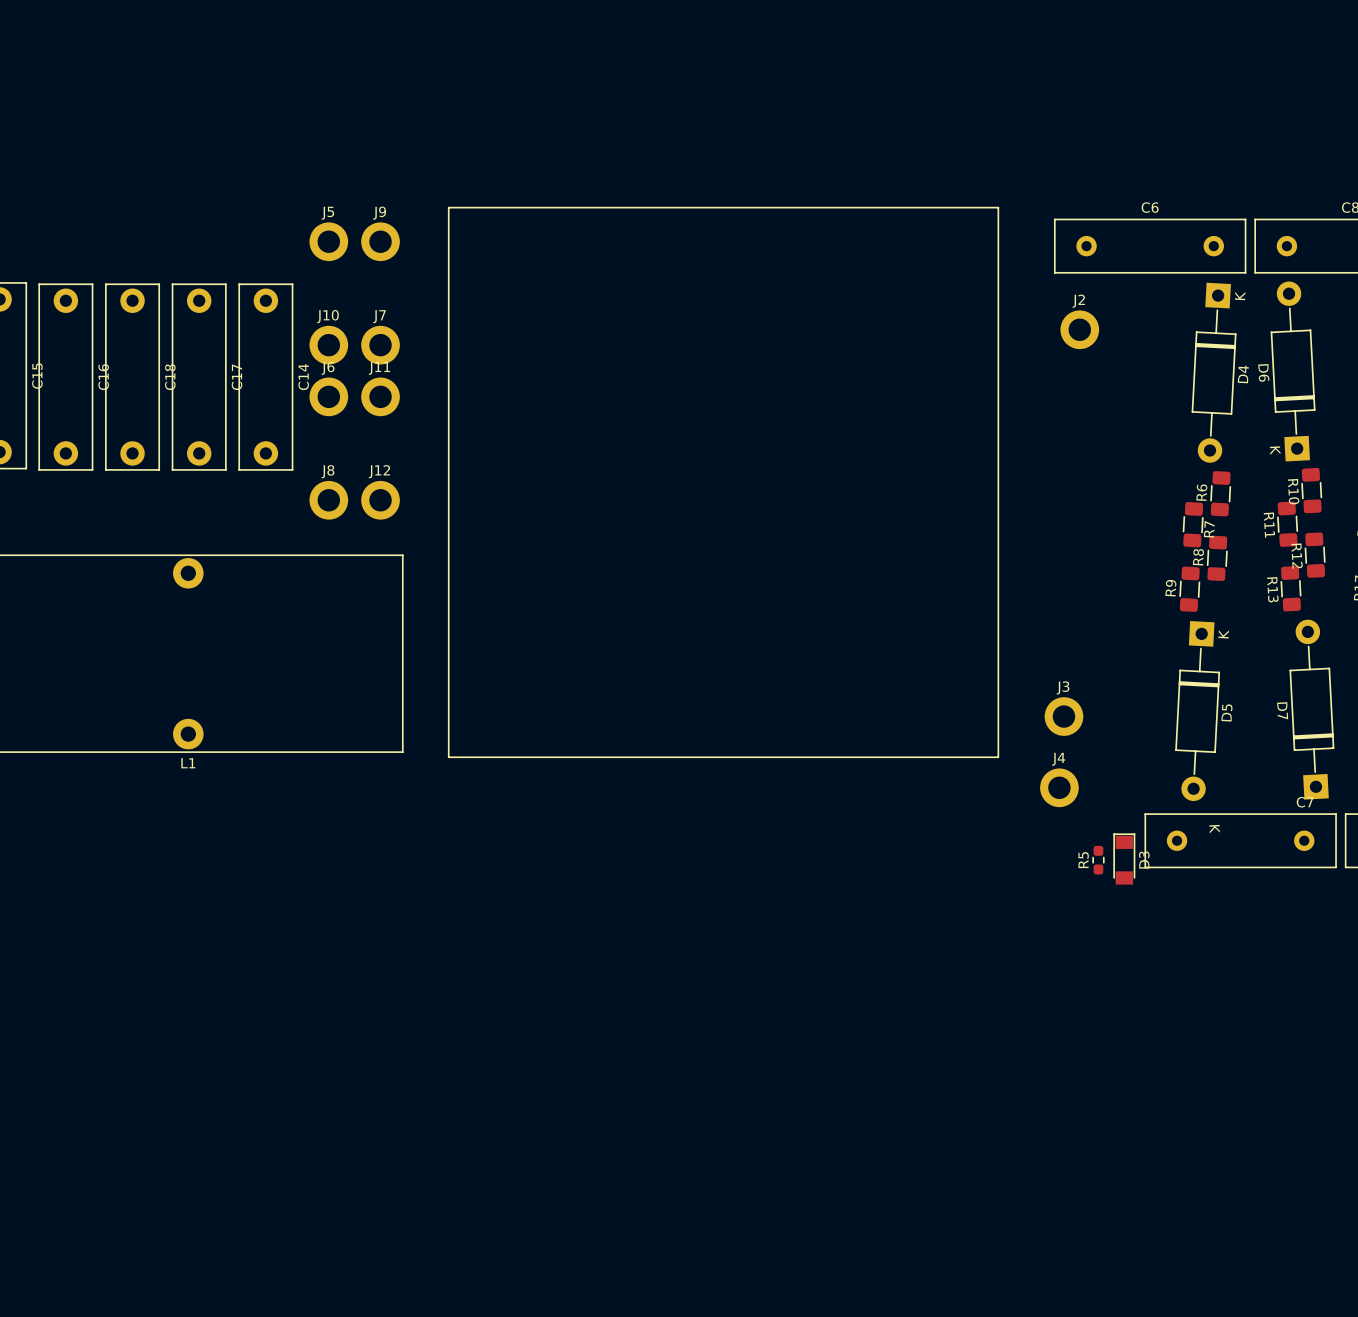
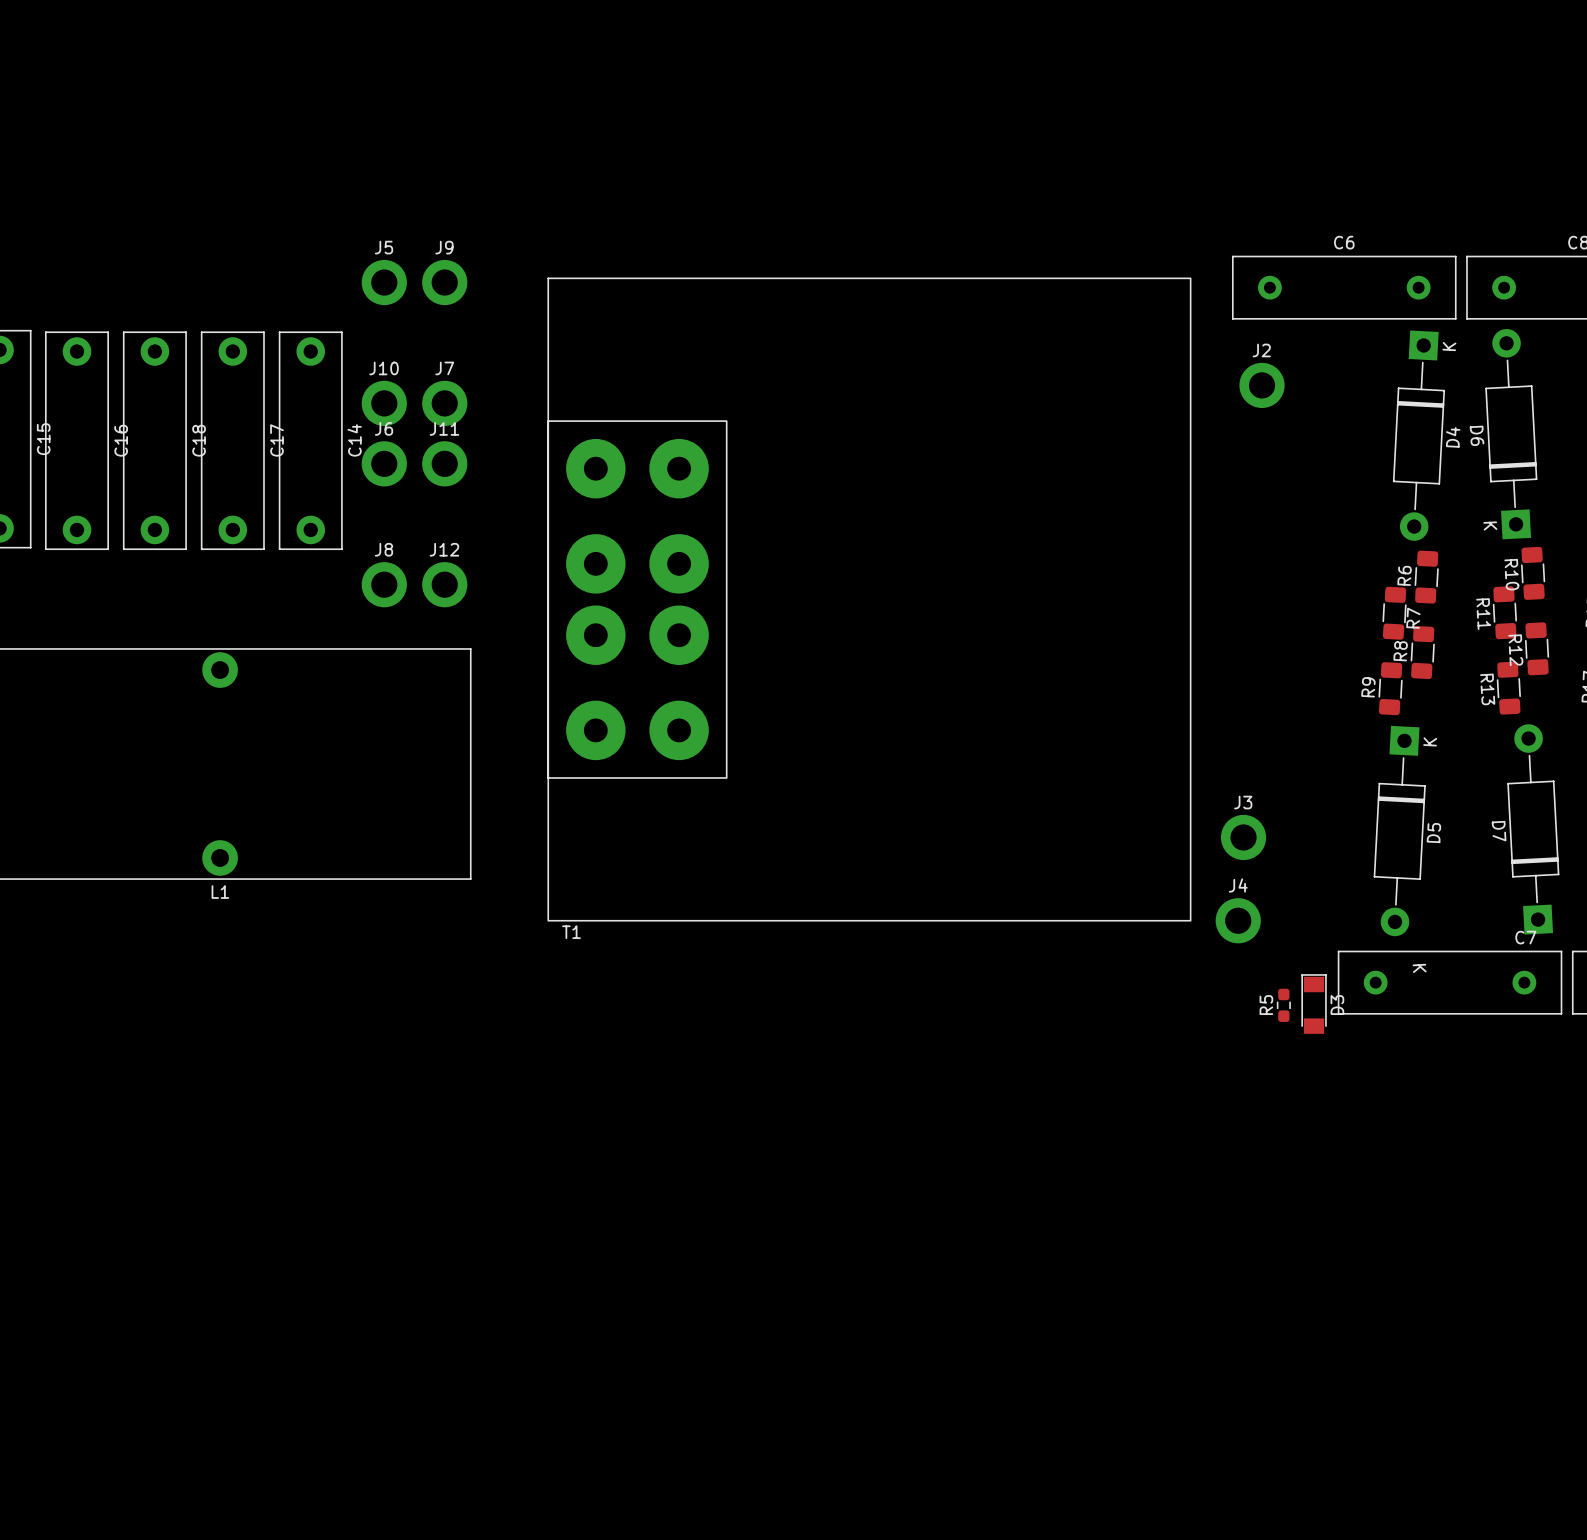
line: (448, 207) (998, 207) (998, 757) (448, 757) (448, 207) -> none
T1: none -> (869, 599)

